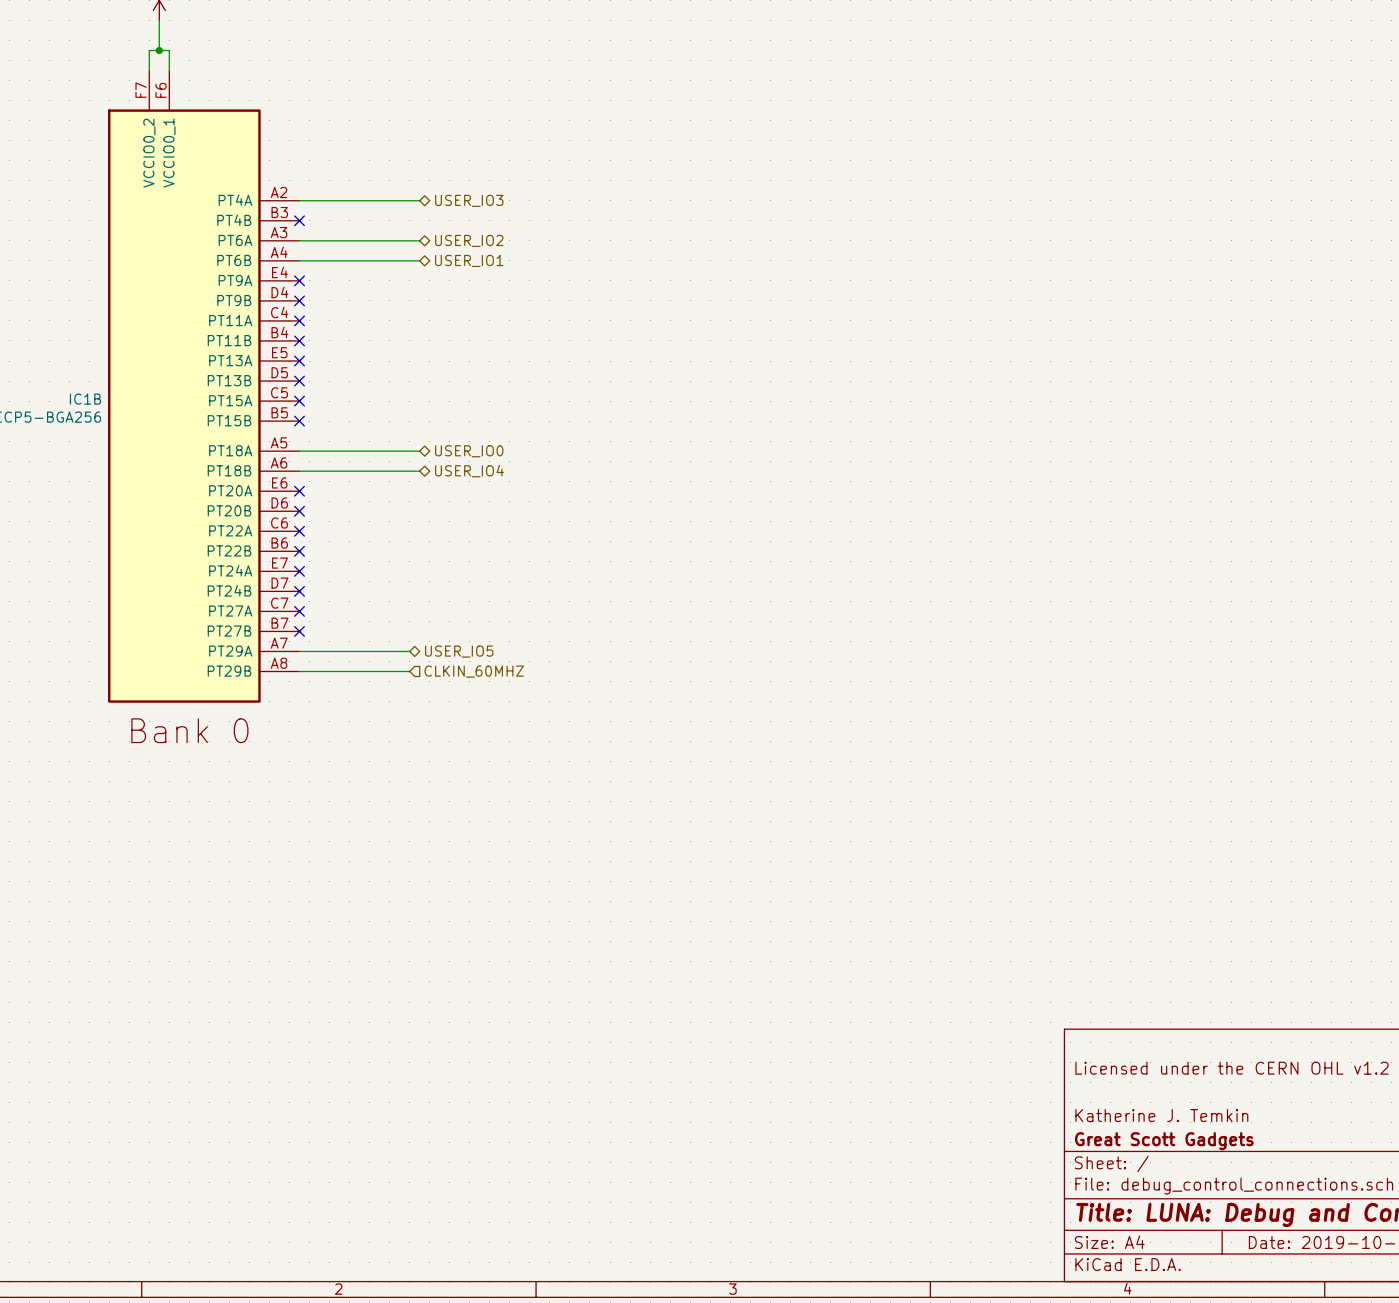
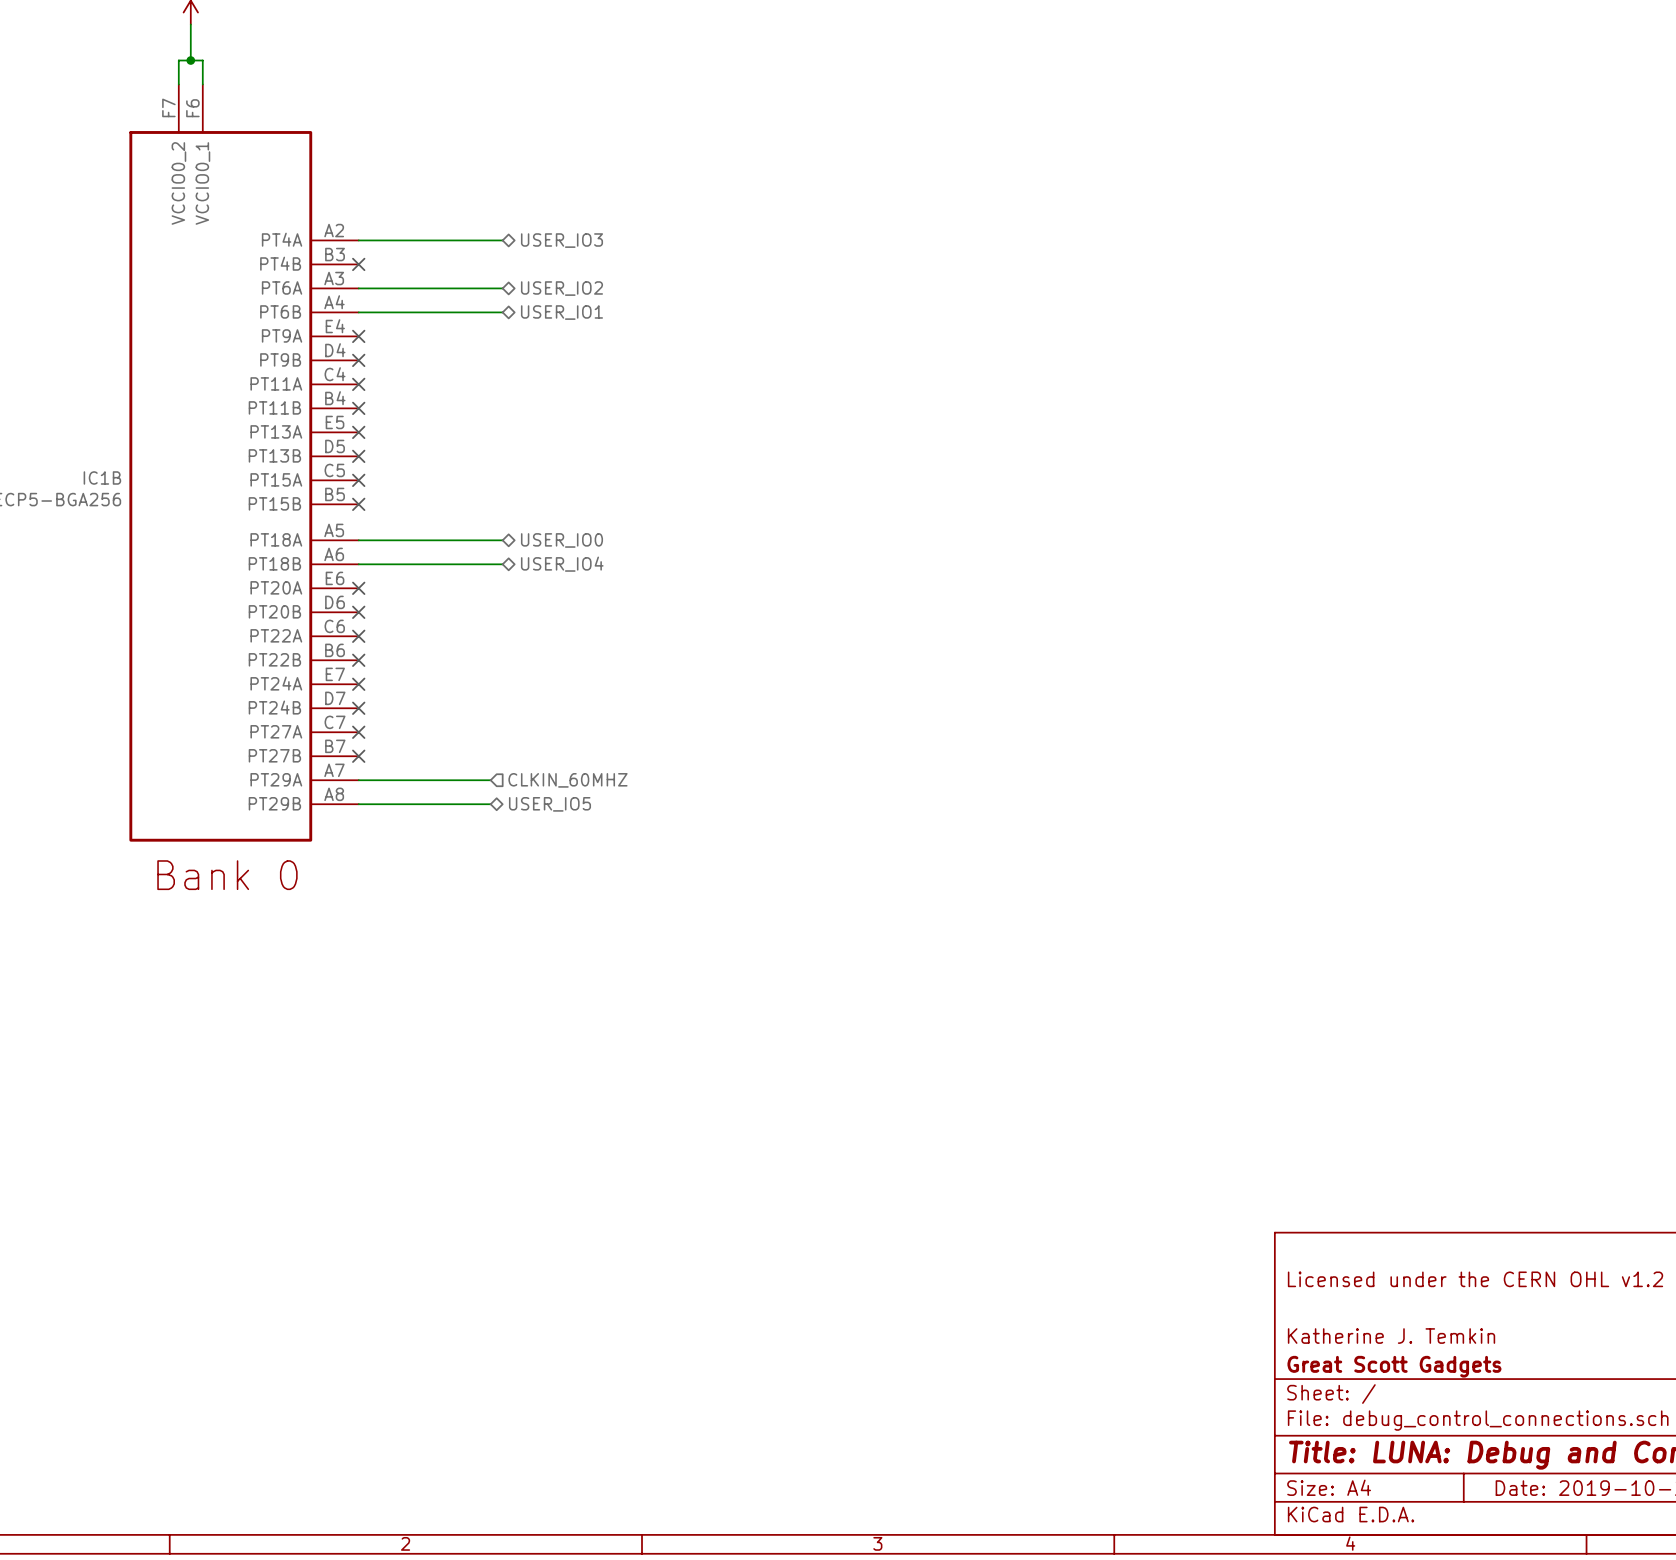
hierarchical label shape: bidirectional (459, 651) -> input (567, 780)
hierarchical label: USER_IO5 (459, 651) -> CLKIN_60MHZ (567, 780)
hierarchical label shape: input (474, 671) -> bidirectional (549, 804)
hierarchical label: CLKIN_60MHZ (474, 671) -> USER_IO5 (549, 804)

